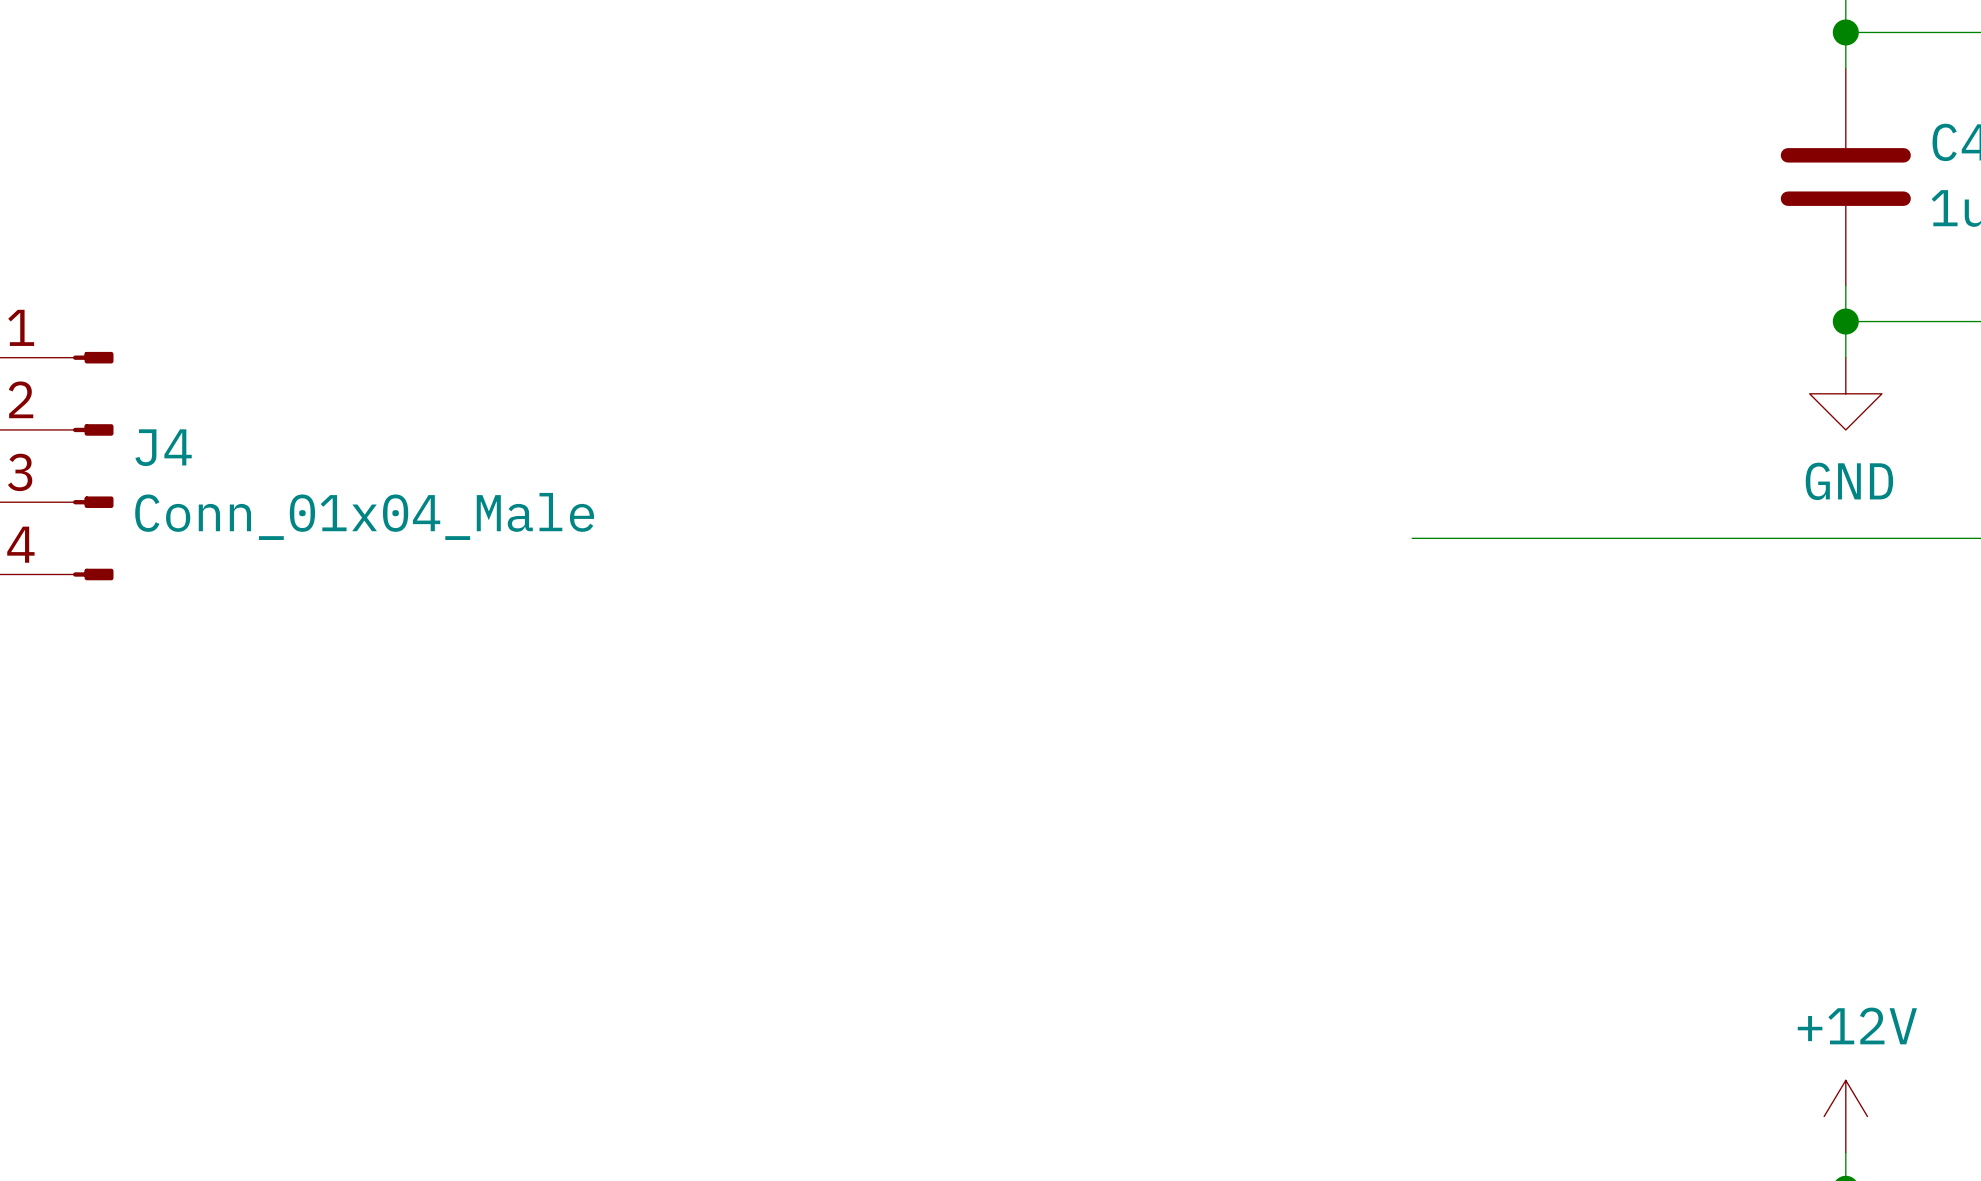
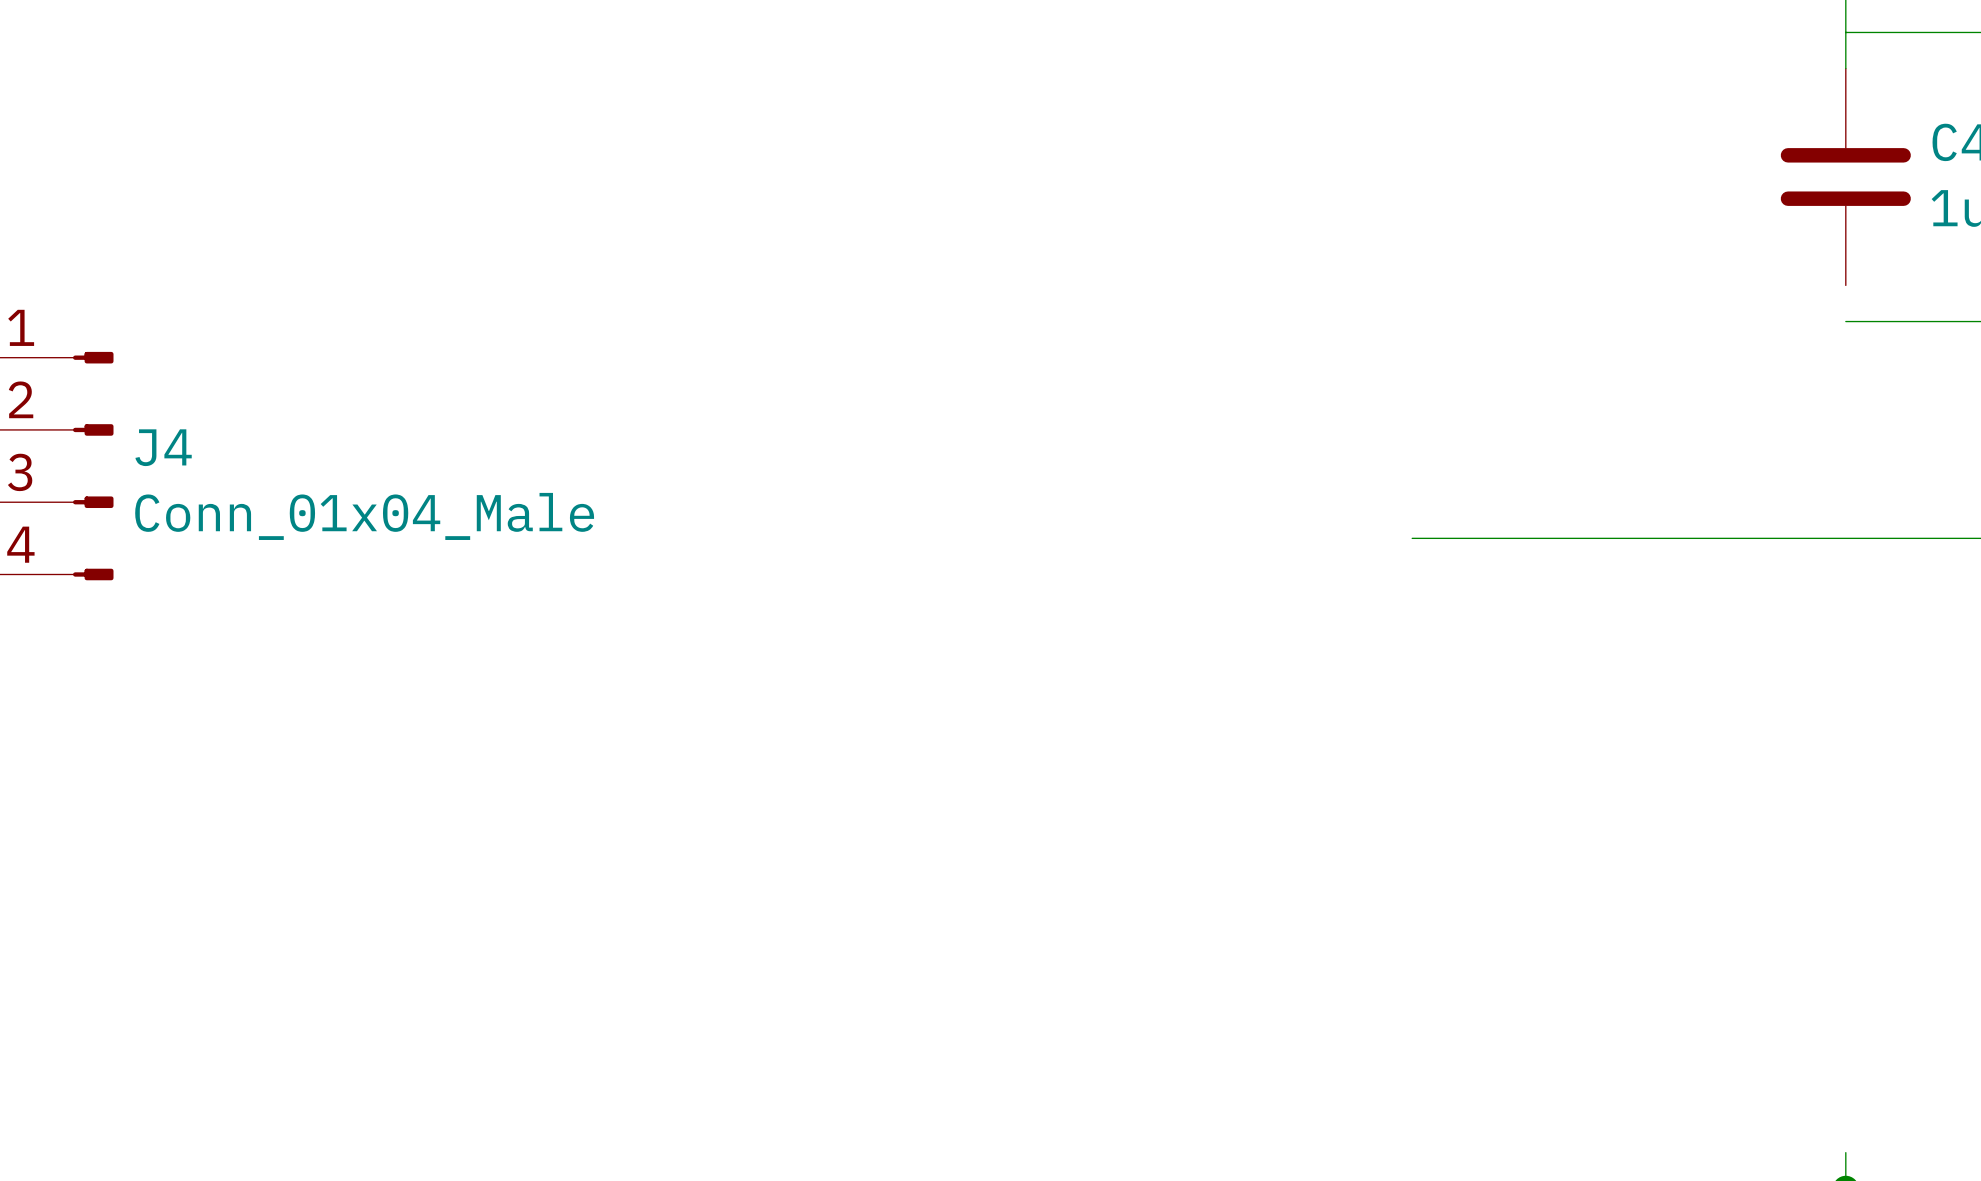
junction: (1845, 32) -> none
wire: (1845, 285) (1845, 357) -> none
junction: (1845, 321) -> none
power symbol: GND (1845, 393) -> none
power symbol: +12V (1845, 1116) -> none

